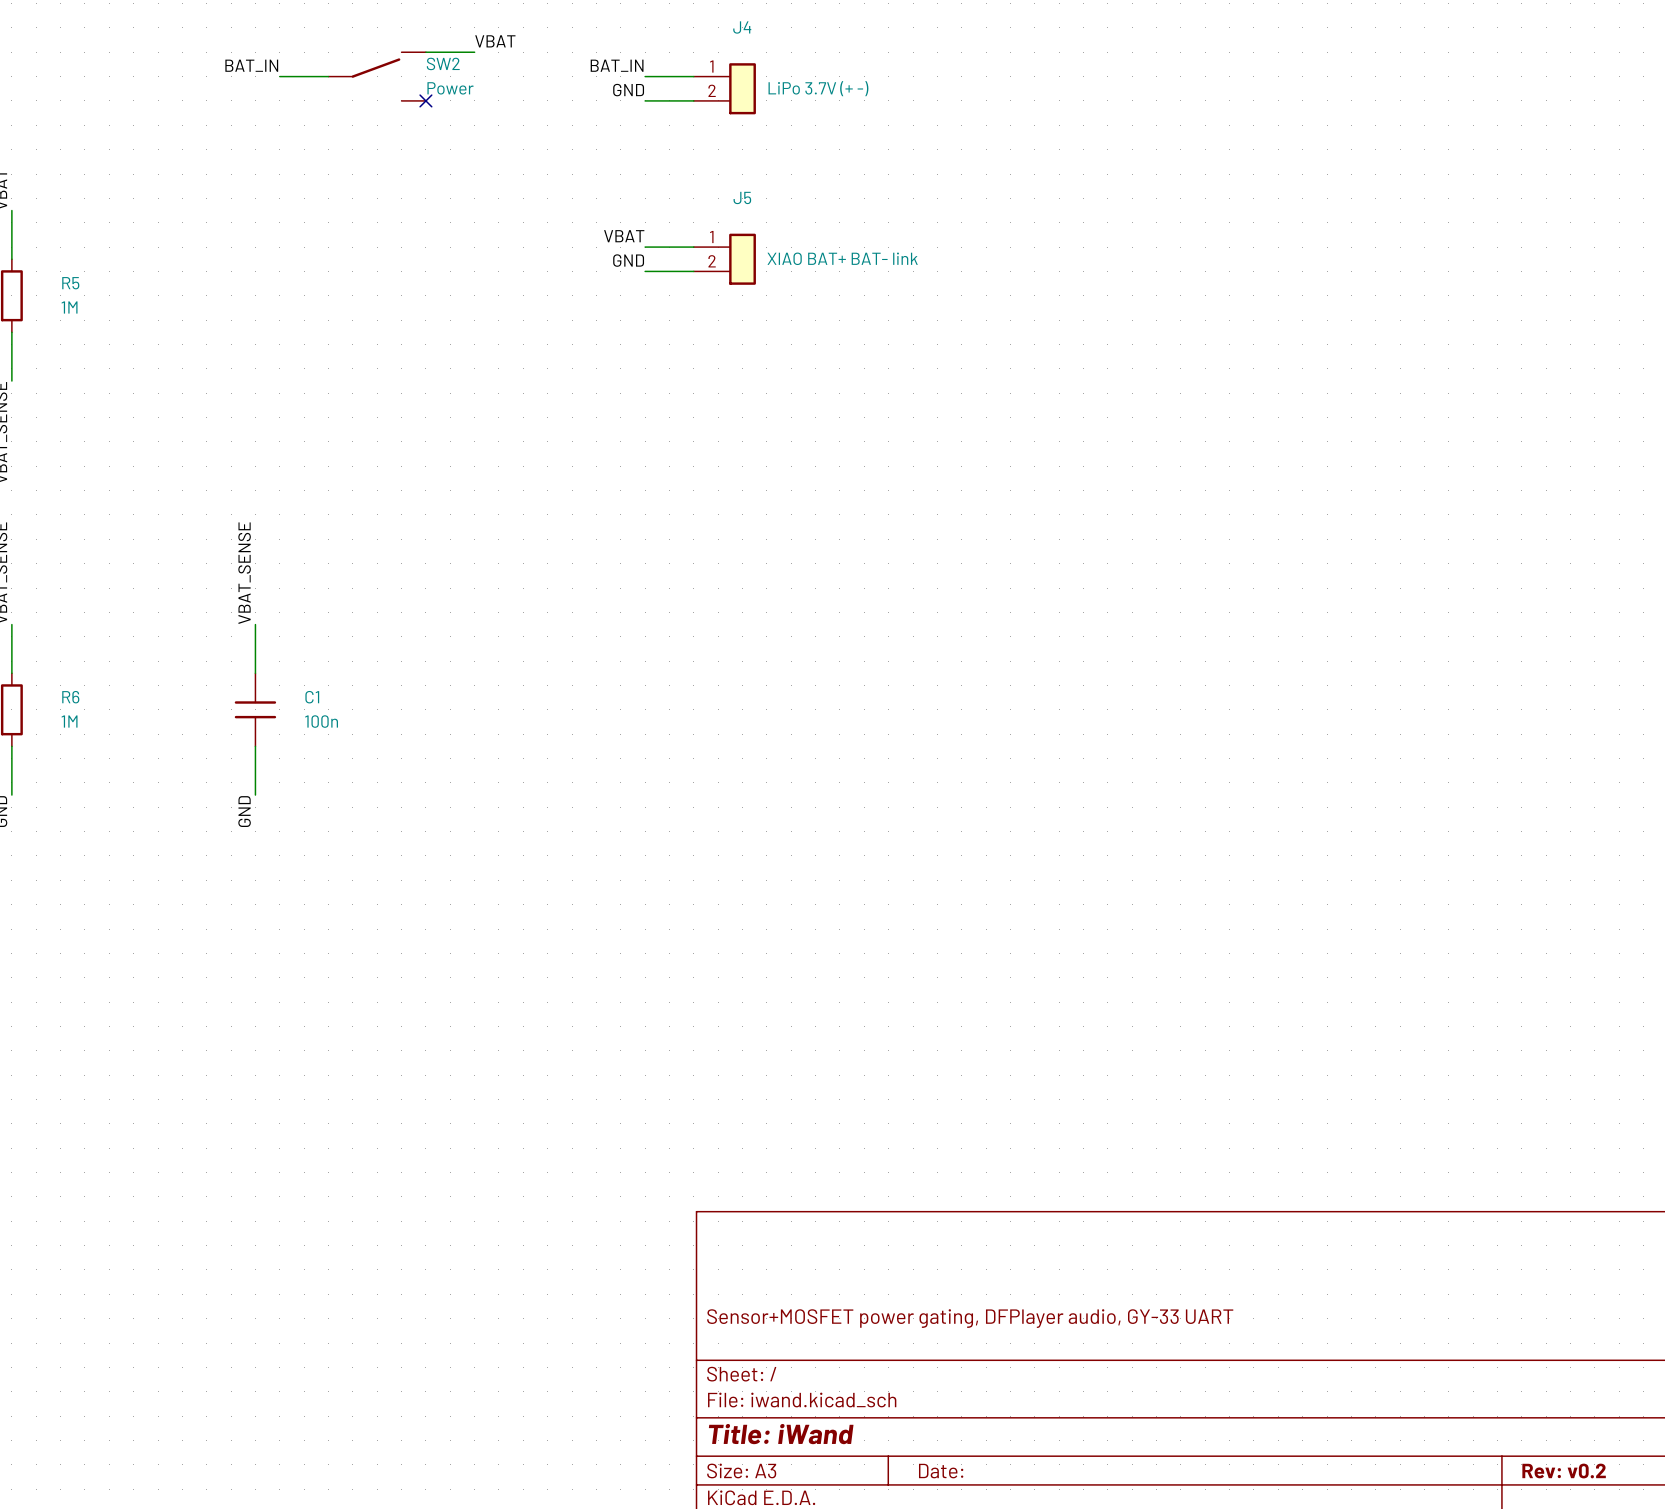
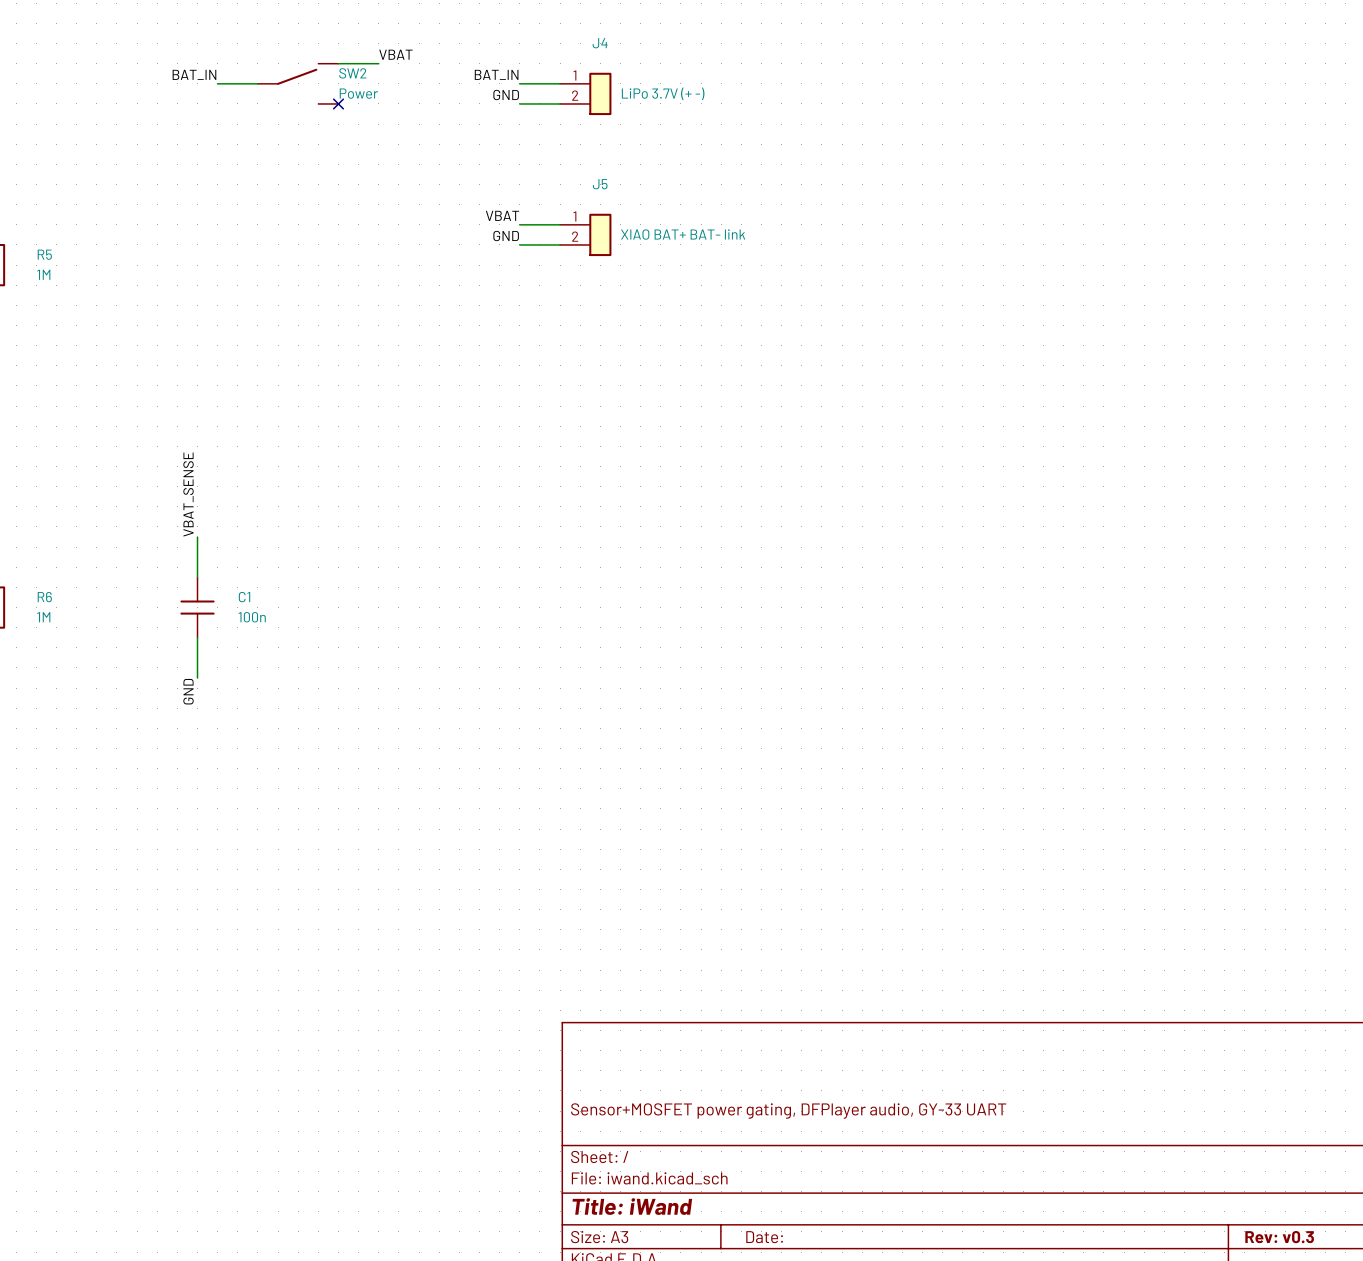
title block: Rev: v0.2 (1564, 1471) -> Rev: v0.3 (1279, 1237)

